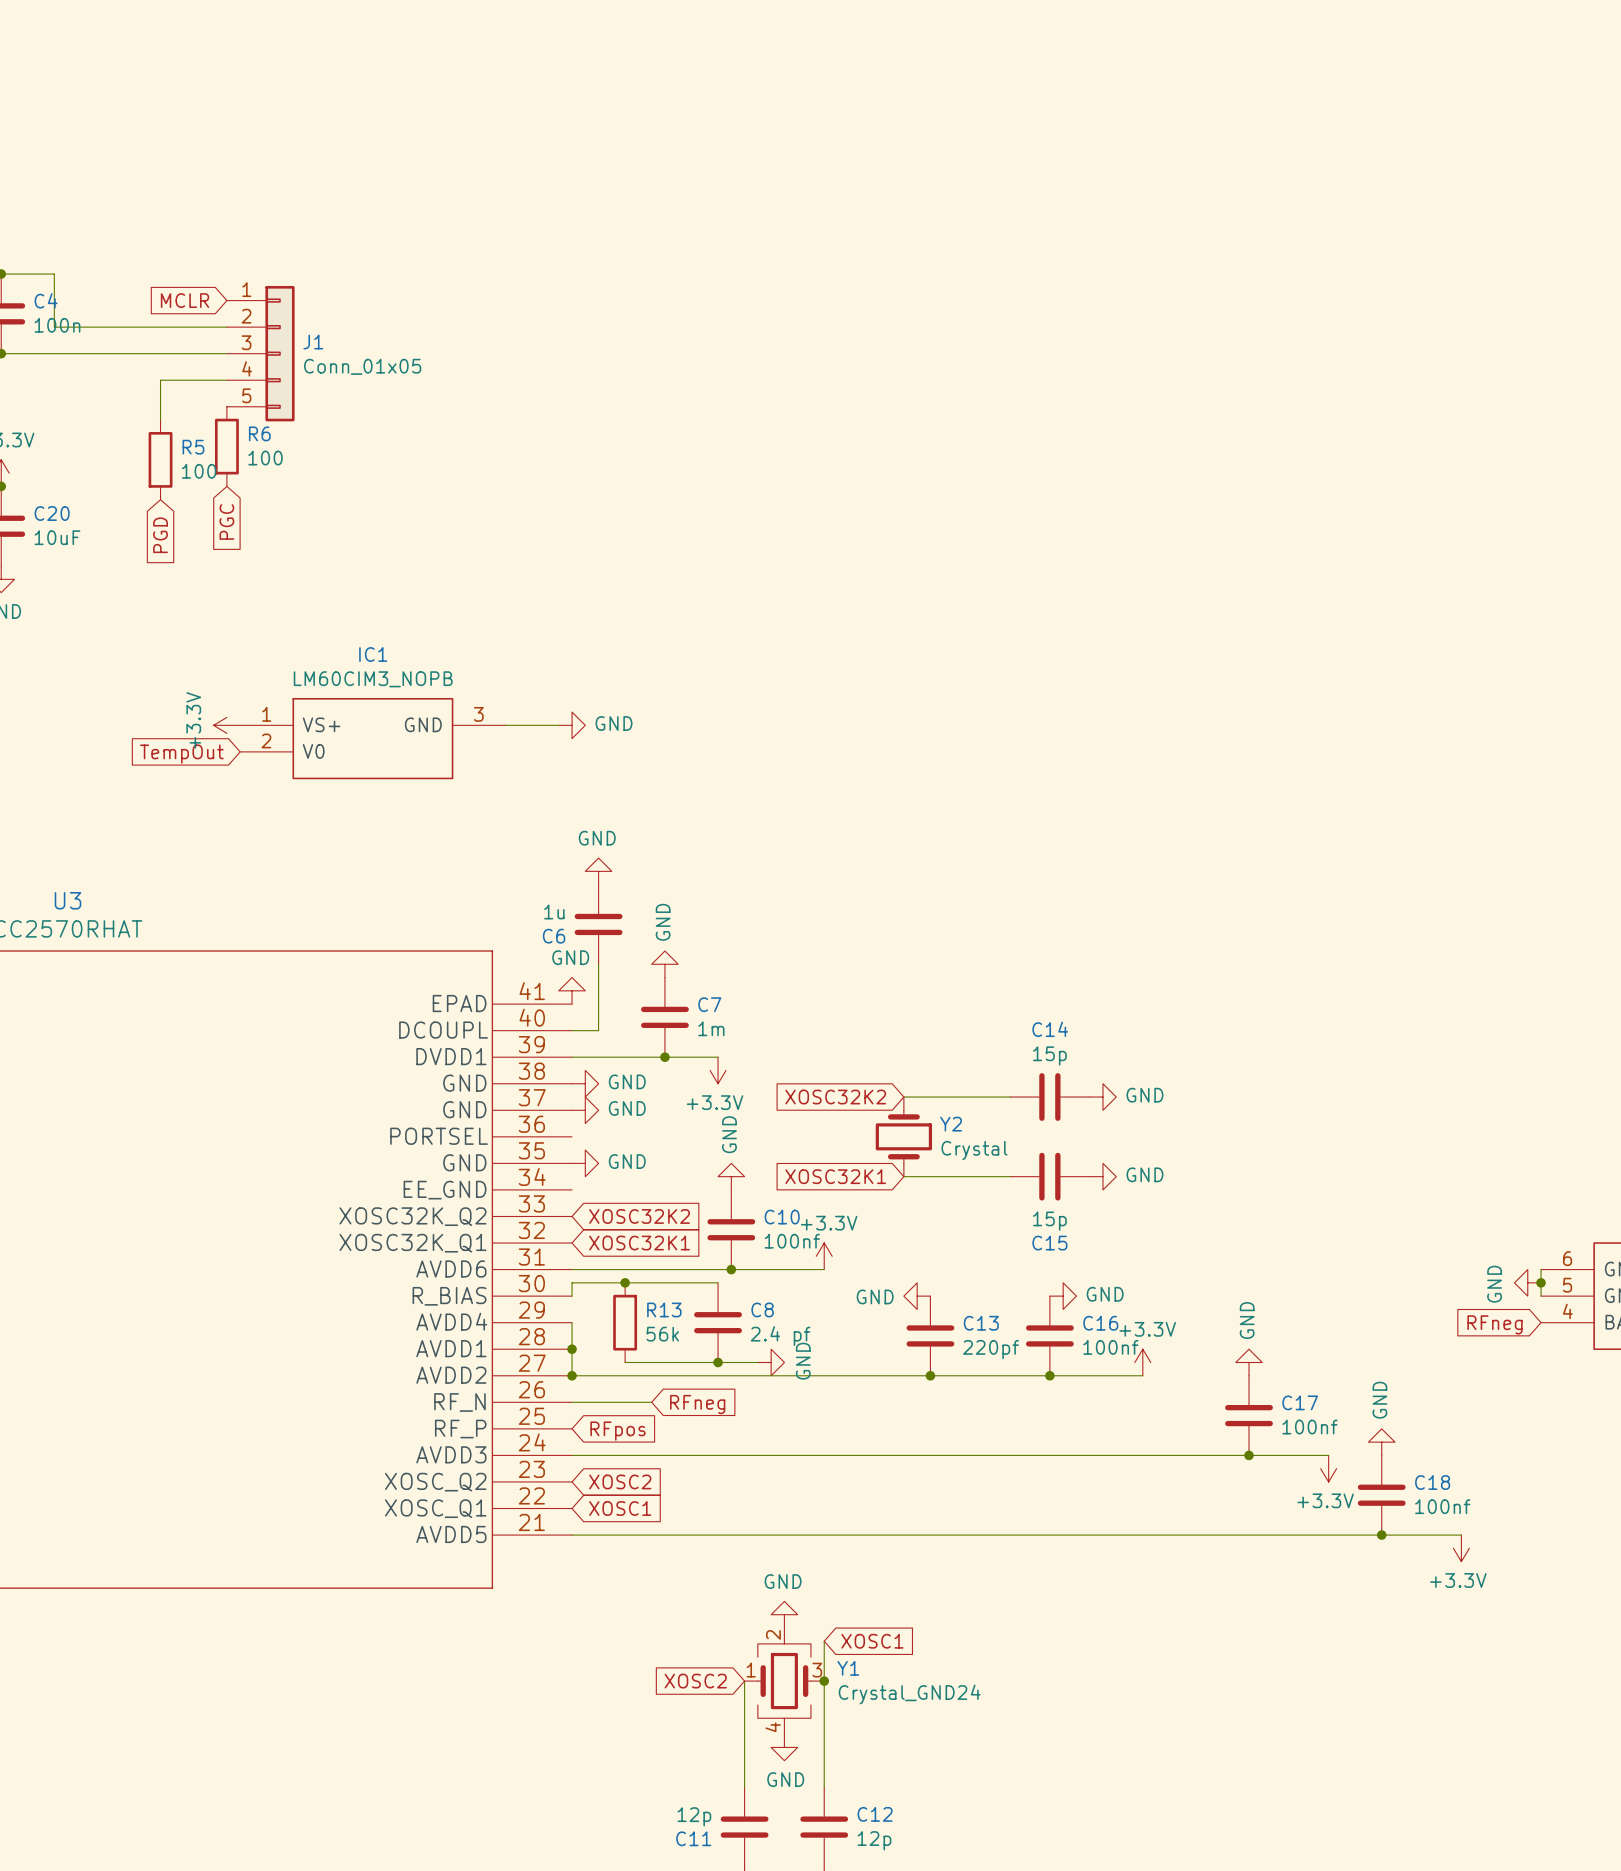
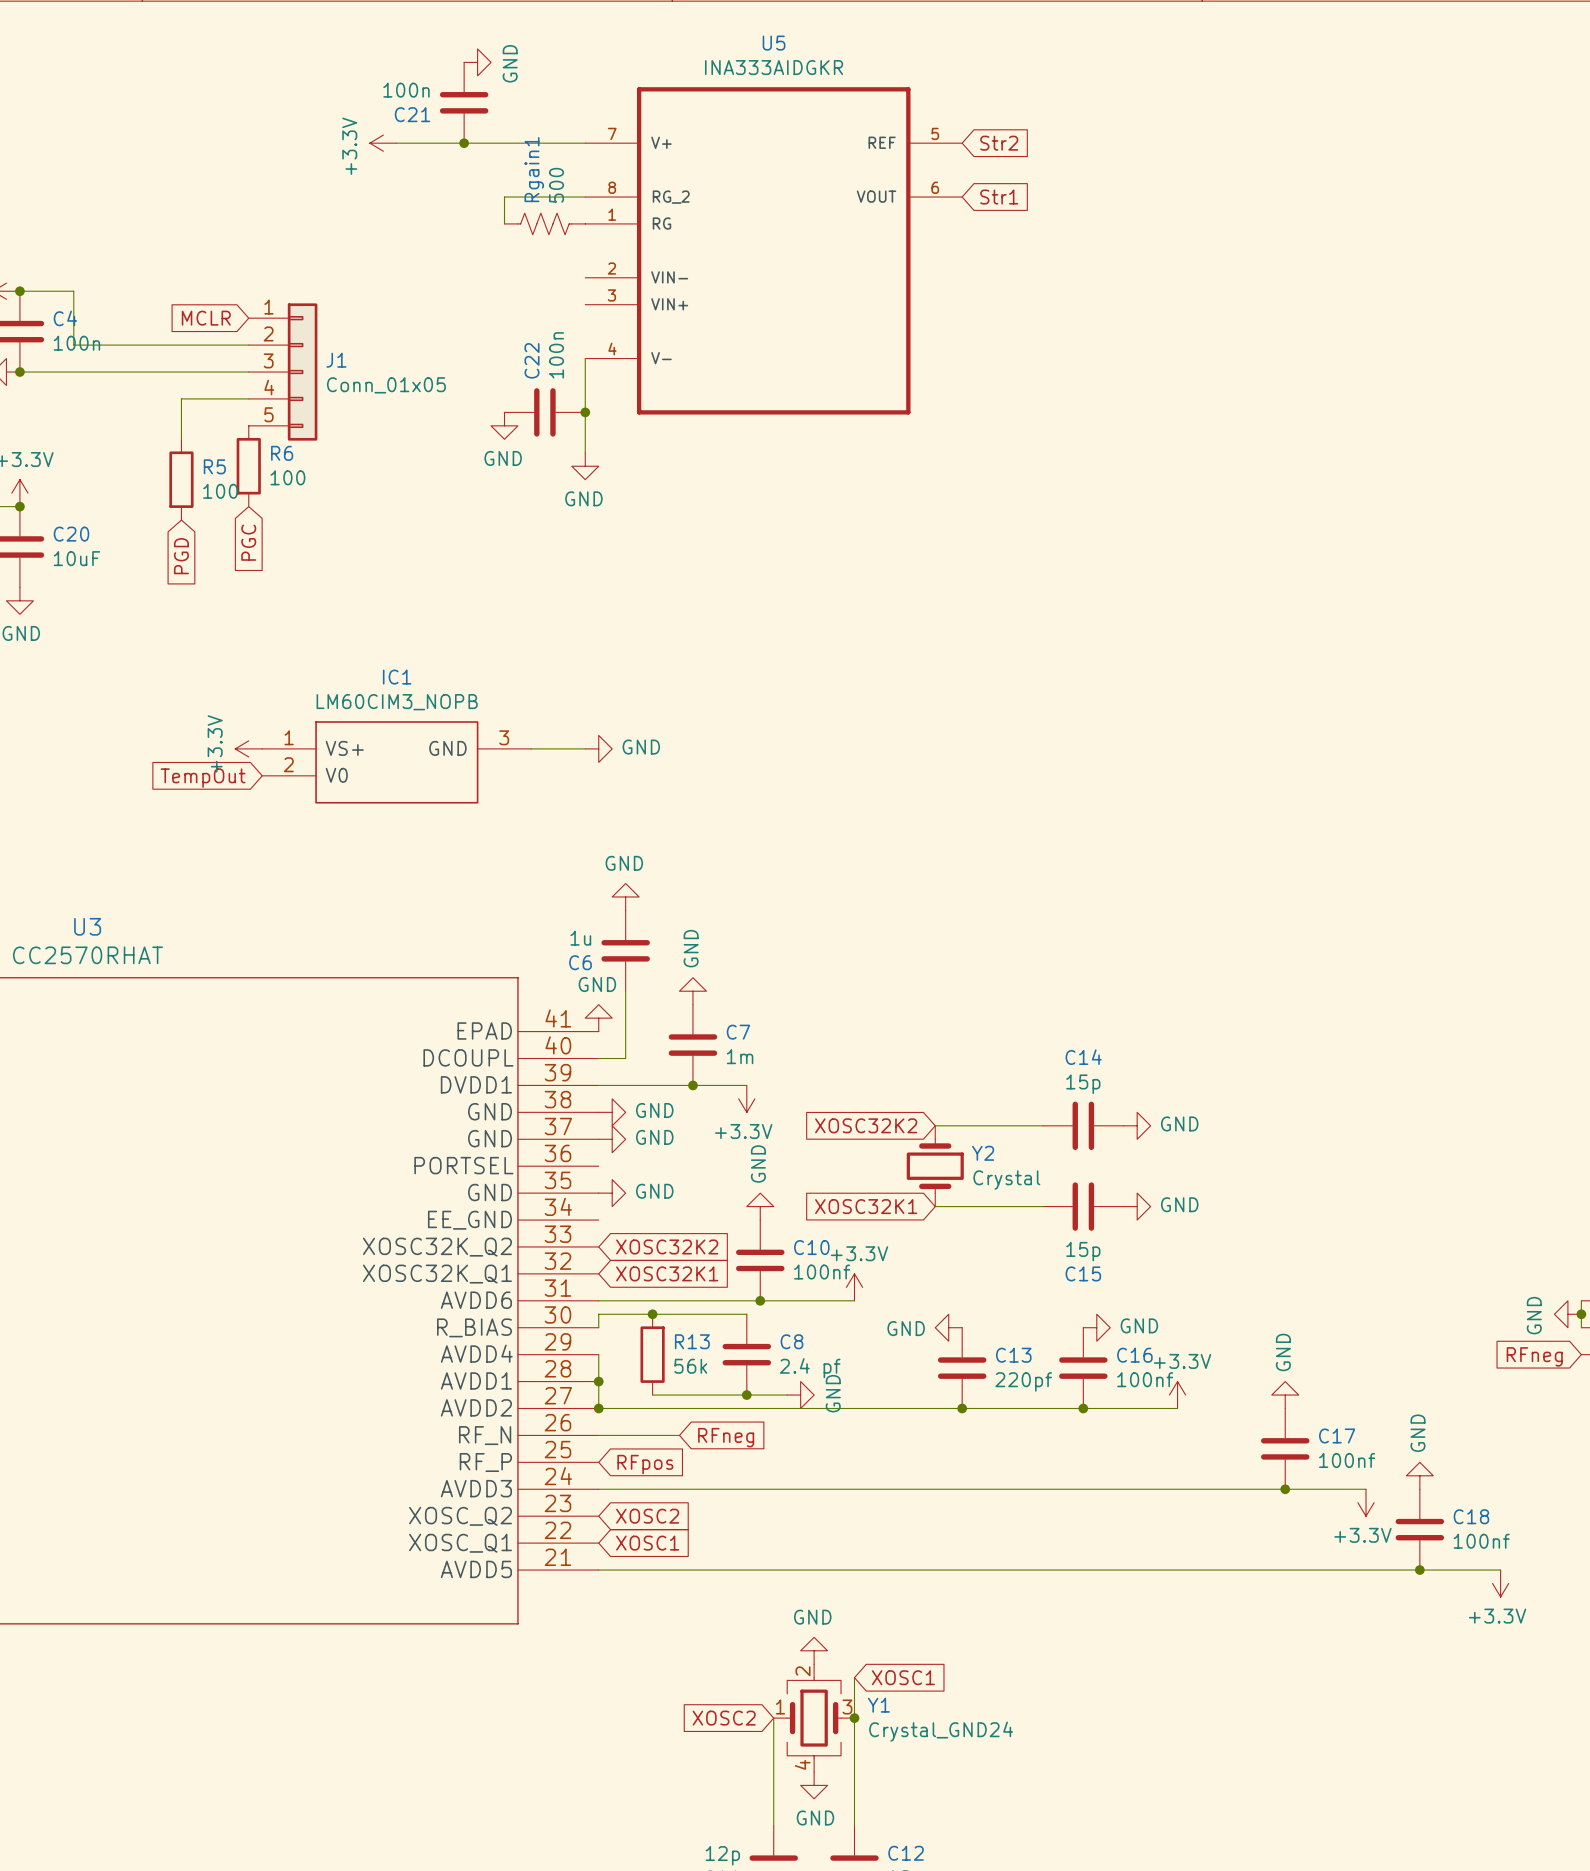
power symbol: none -> GND (477, 62)
C21: none -> 100n (464, 102)
power symbol: none -> +3.3V (383, 143)
wire: none -> (396, 143) (585, 143)
junction: none -> (464, 143)
global label: none -> Str2 (999, 143)
wire: none -> (585, 197) (504, 197) (504, 223)
global label: none -> Str1 (999, 197)
Rgain1: none -> 500 (544, 223)
U5: none -> INA333AIDGKR (773, 250)
wire: none -> (585, 358) (585, 452)
C22: none -> 100n (544, 412)
junction: none -> (585, 412)
power symbol: none -> GND (504, 425)
power symbol: none -> GND (585, 466)

